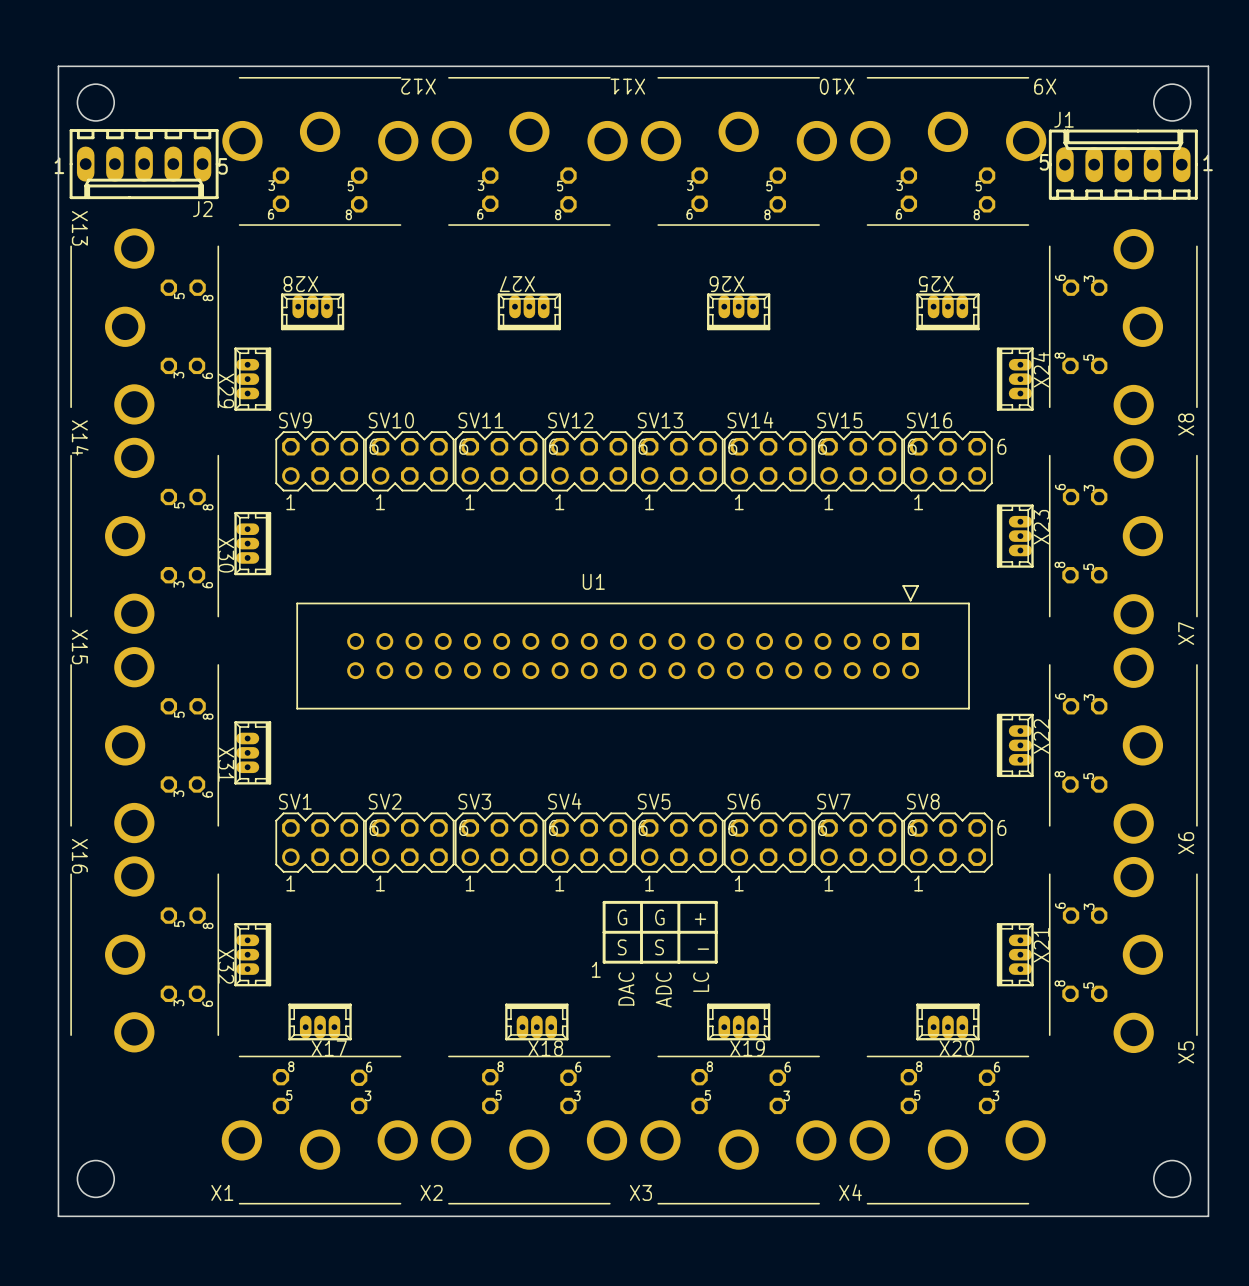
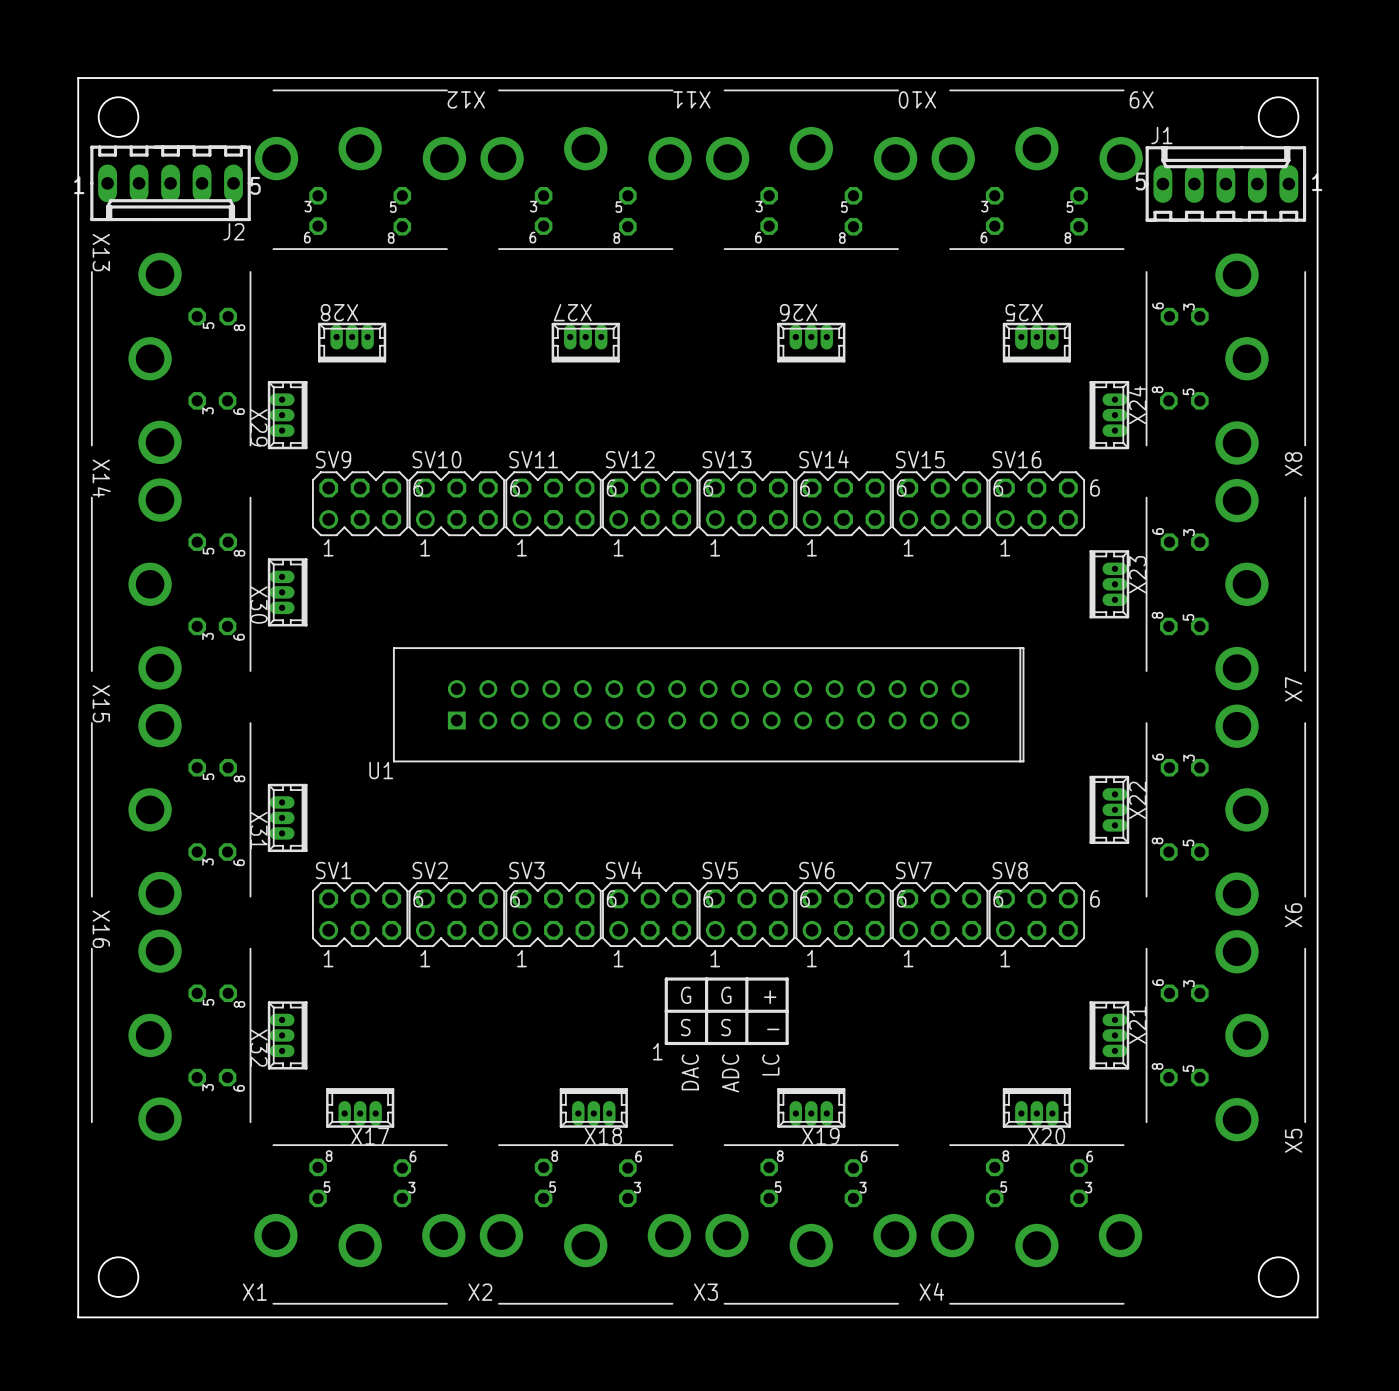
U1 name position: U1 (593, 581) -> U1 (381, 770)
U1 footprint: [296, 585, 970, 710] -> [392, 647, 1025, 763]

